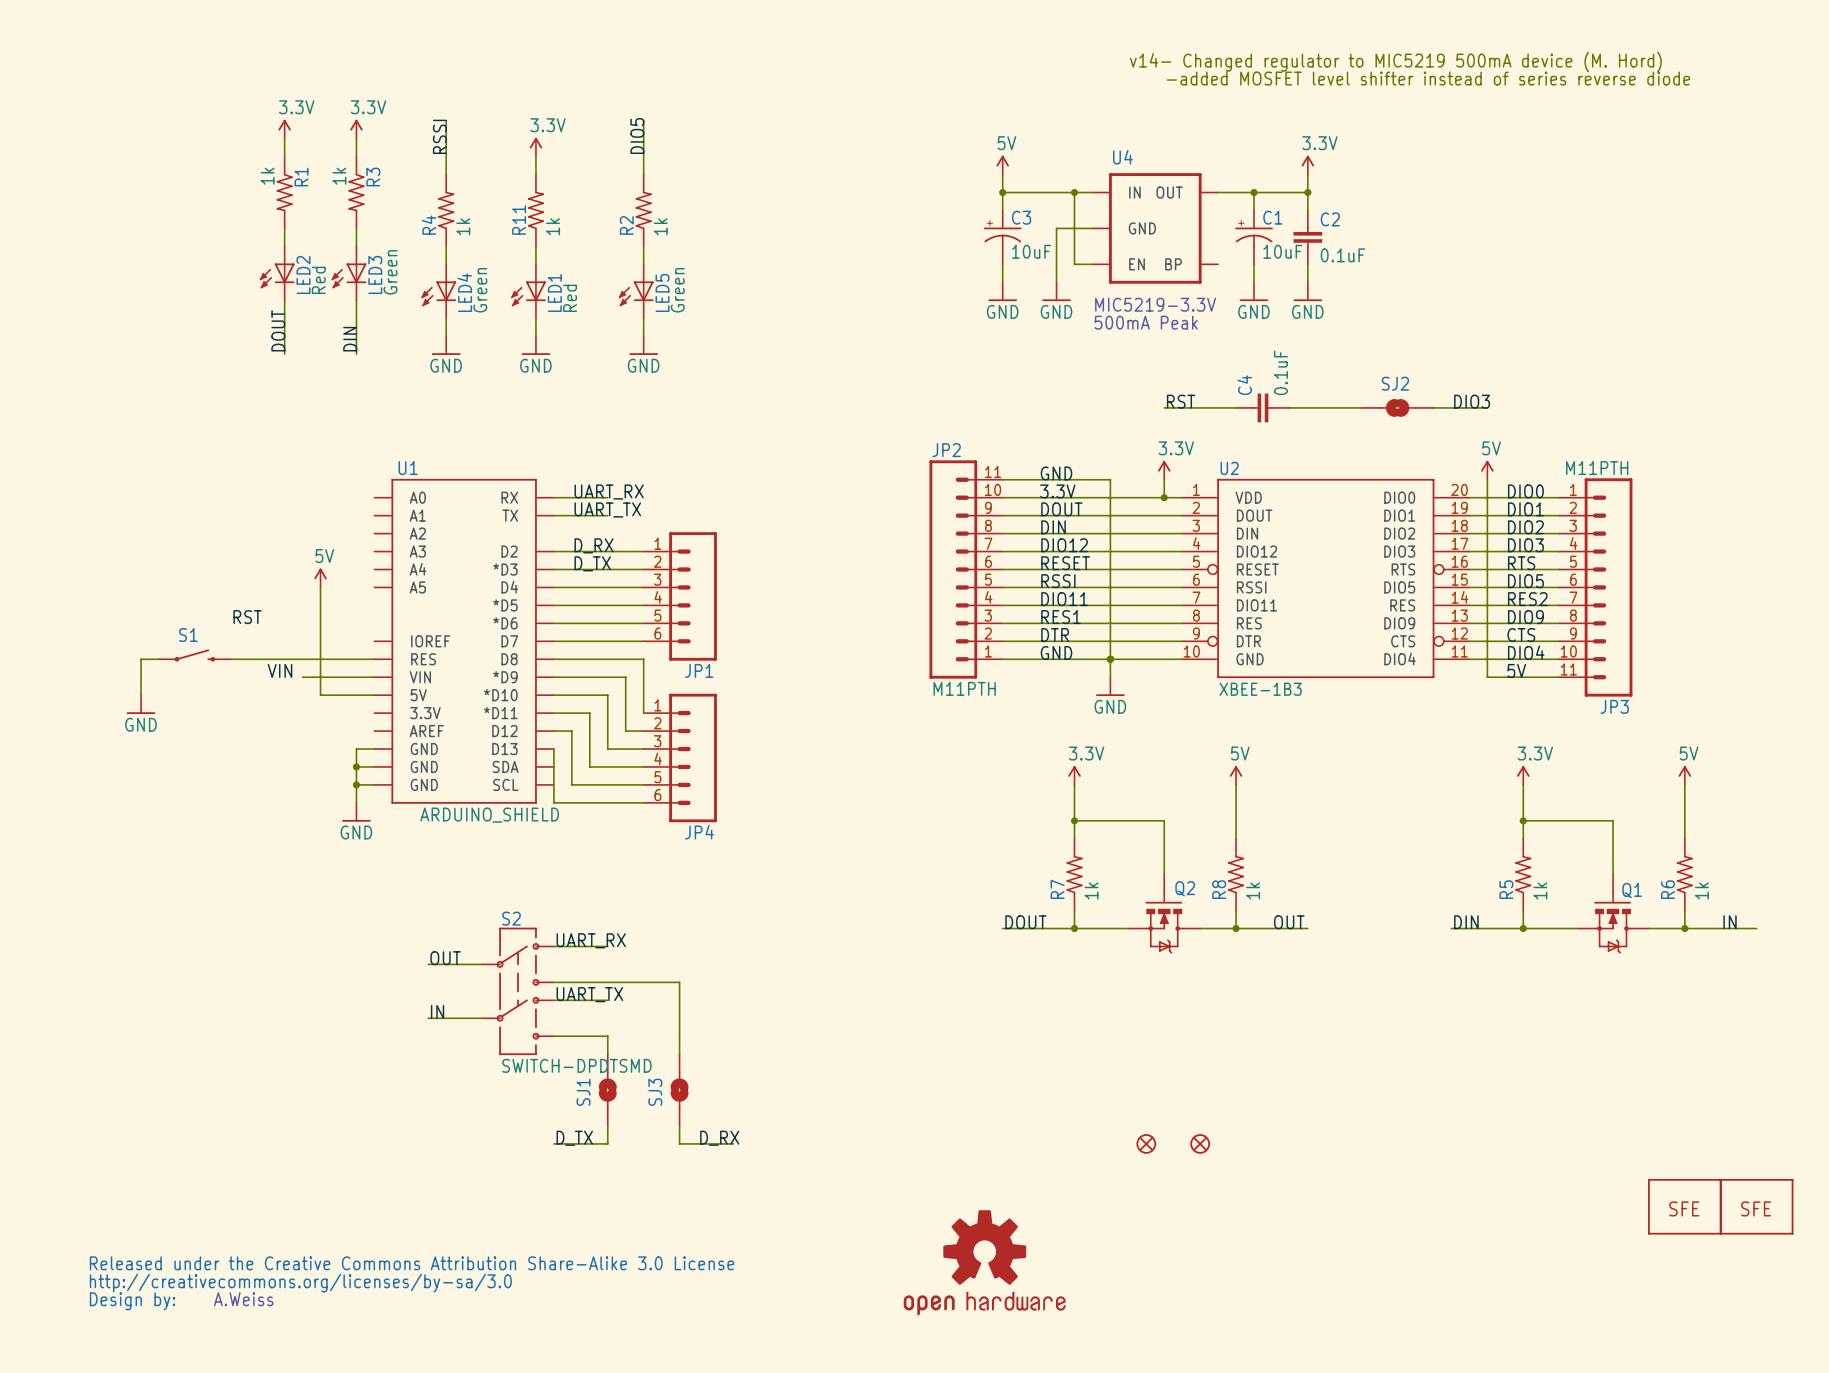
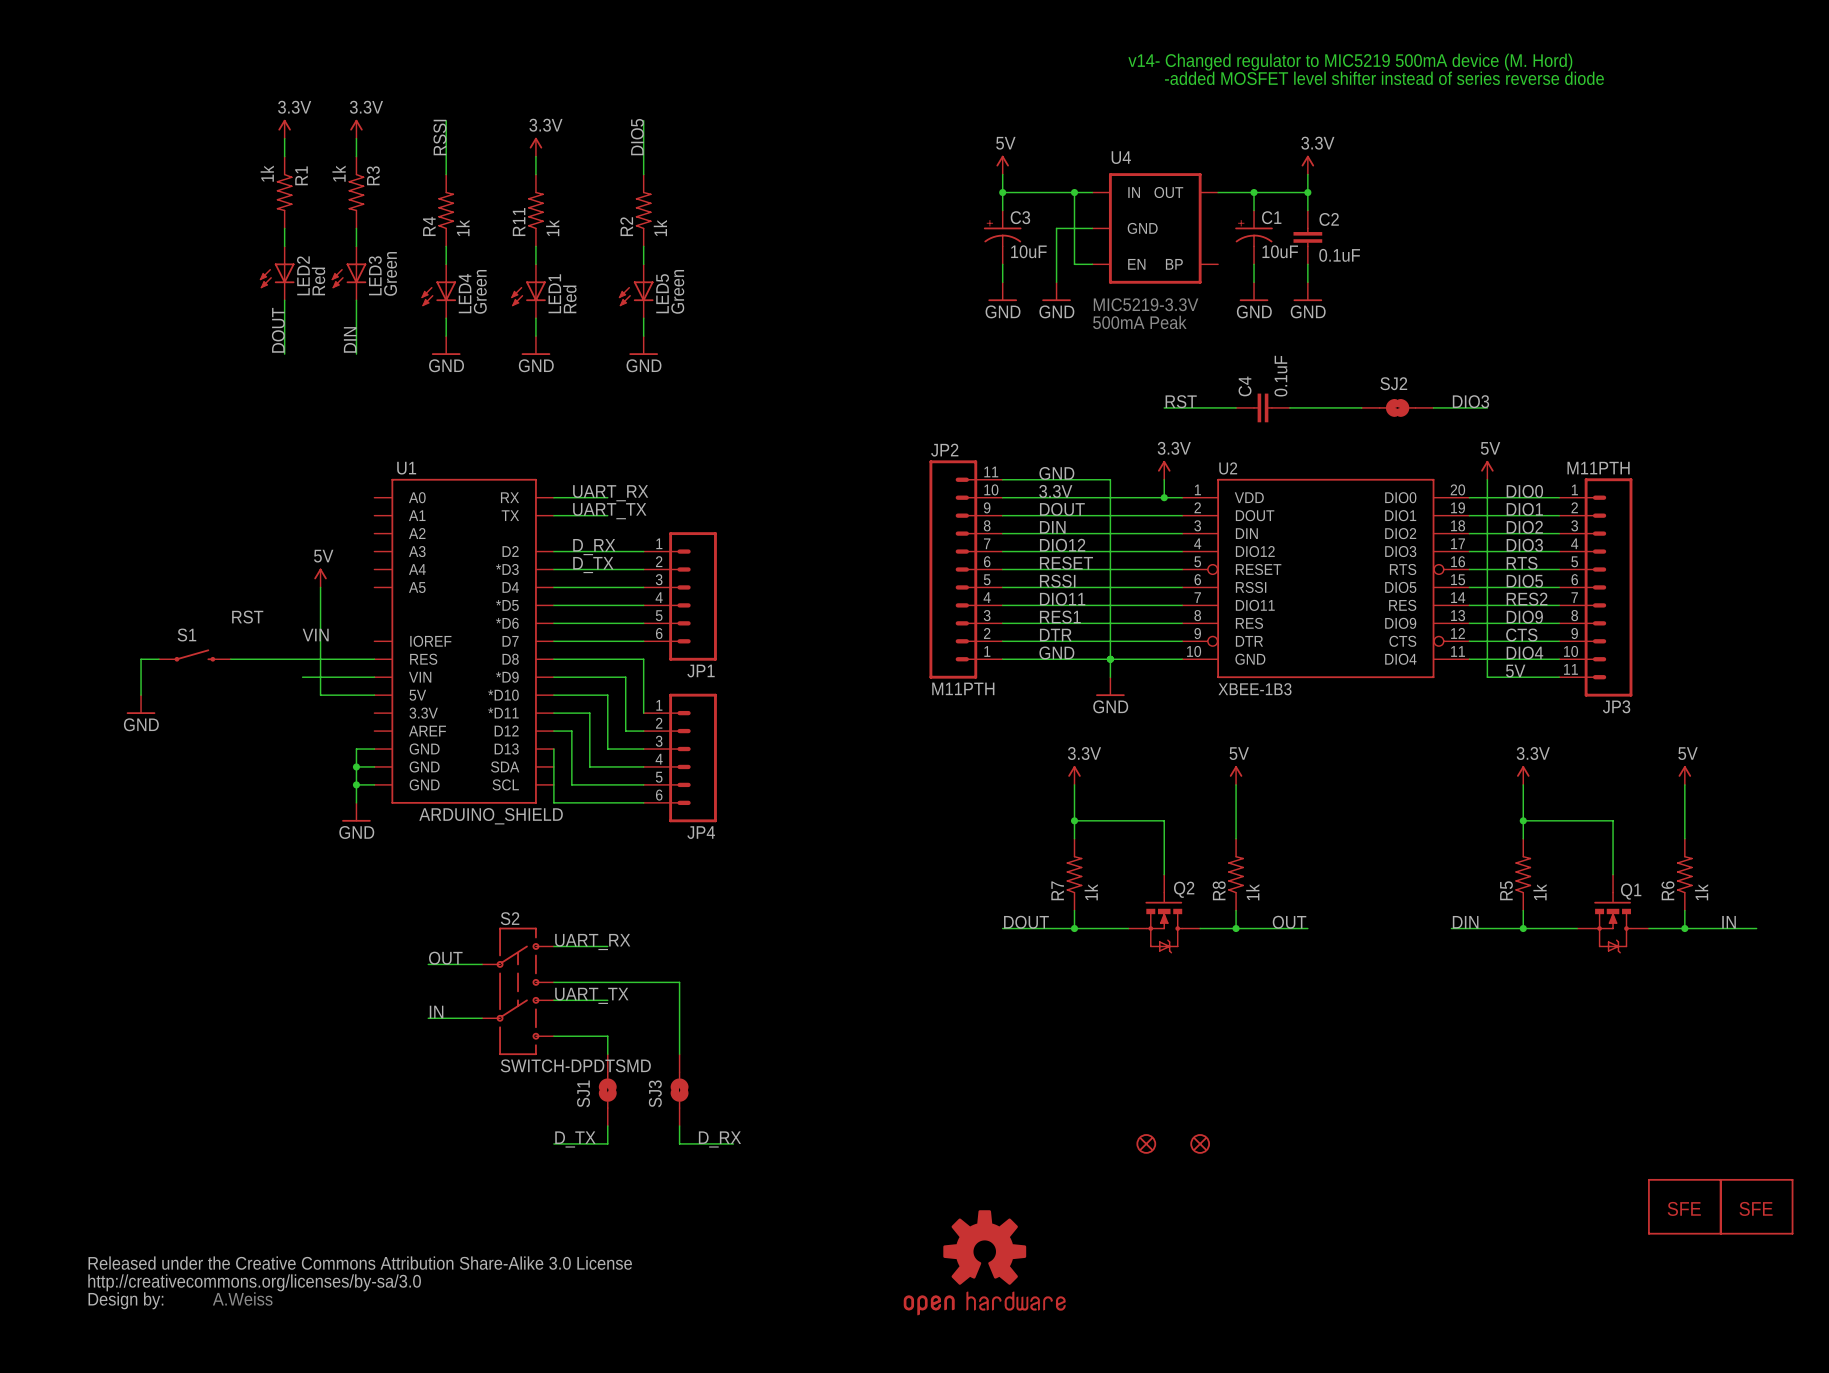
label position: VIN (280, 670) -> VIN (315, 635)

